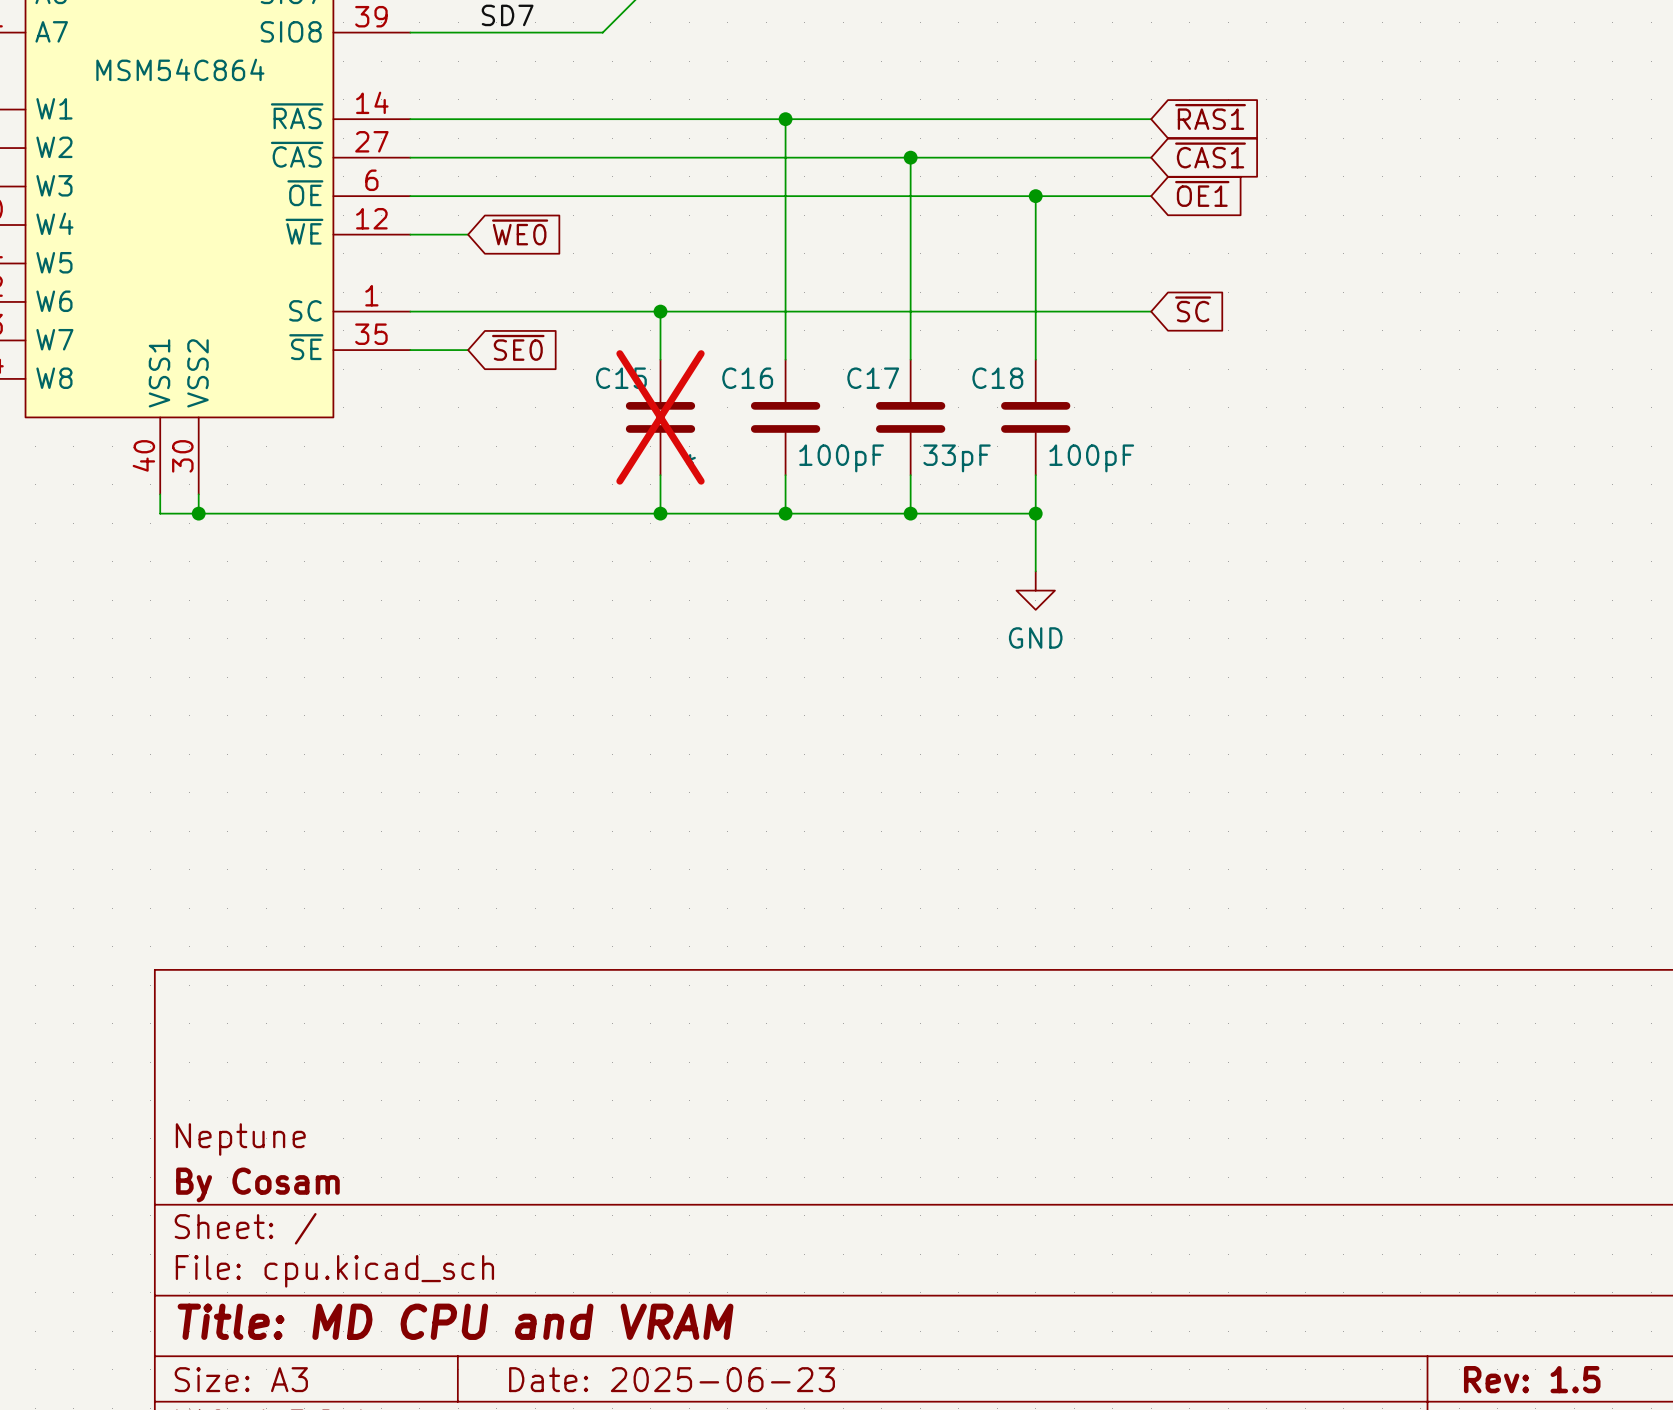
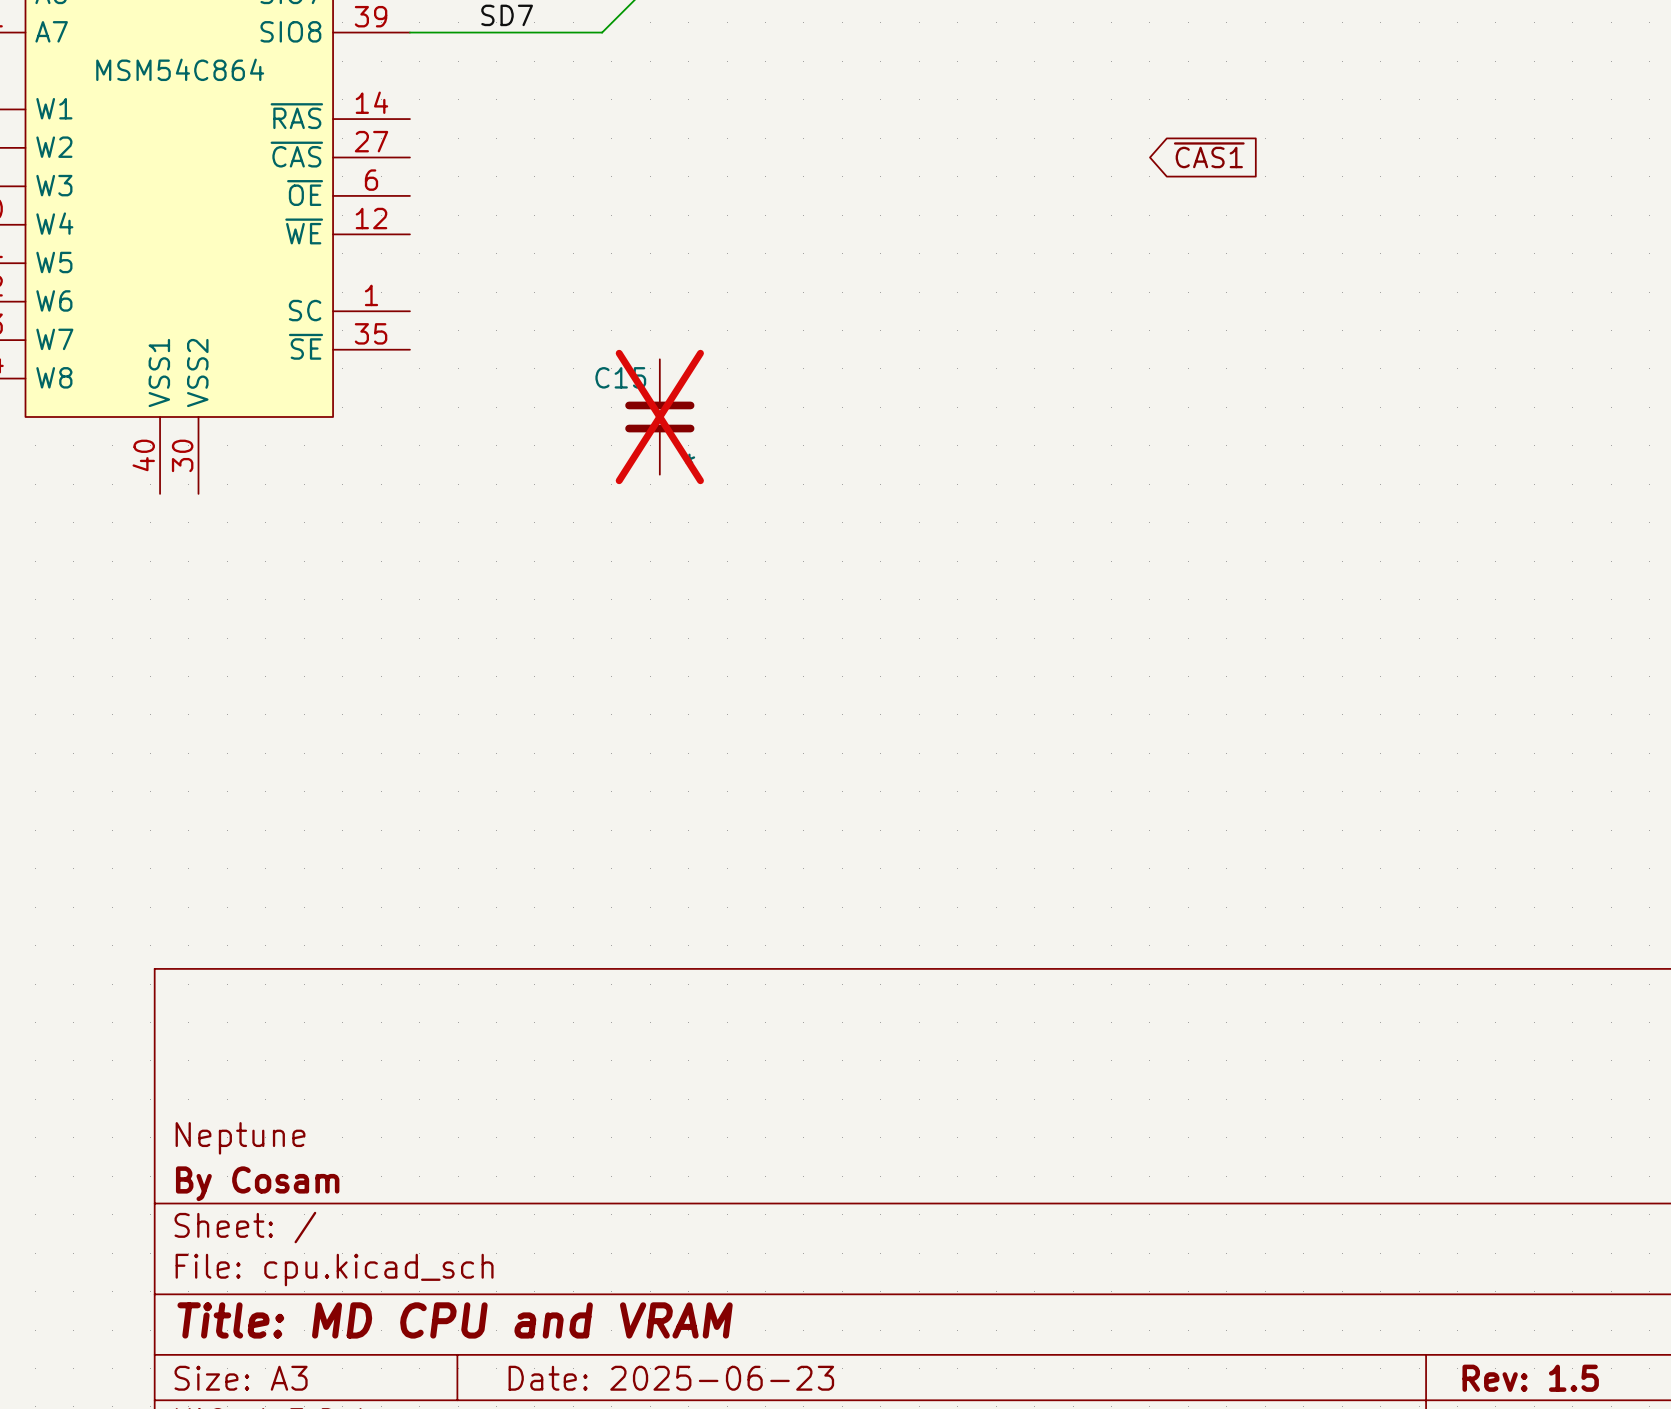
global label: ~{RAS1} (1210, 116) -> none
wire: (410, 119) (1151, 119) -> none
wire: (785, 119) (785, 359) -> none
junction: (785, 119) -> none
wire: (410, 157) (1151, 157) -> none
wire: (910, 157) (910, 359) -> none
junction: (910, 157) -> none
global label: ~{OE1} (1202, 193) -> none
wire: (410, 196) (1151, 196) -> none
wire: (1035, 196) (1035, 359) -> none
junction: (1035, 196) -> none
global label: ~{WE0} (520, 232) -> none
wire: (410, 234) (468, 234) -> none
global label: ~{SC} (1193, 309) -> none
wire: (410, 311) (1151, 311) -> none
wire: (660, 311) (660, 359) -> none
junction: (660, 311) -> none
global label: ~{SE0} (518, 347) -> none
wire: (410, 350) (468, 350) -> none
C16: 100pF (785, 417) -> none
C17: 33pF (910, 417) -> none
C18: 100pF (1035, 417) -> none
wire: (660, 475) (660, 513) -> none
wire: (785, 475) (785, 513) -> none
wire: (910, 475) (910, 513) -> none
wire: (1035, 475) (1035, 571) -> none
wire: (160, 494) (160, 513) (1035, 513) -> none
wire: (198, 494) (198, 513) -> none
junction: (198, 513) -> none
junction: (660, 513) -> none
junction: (785, 513) -> none
junction: (910, 513) -> none
junction: (1035, 513) -> none
power symbol: GND (1035, 590) -> none

